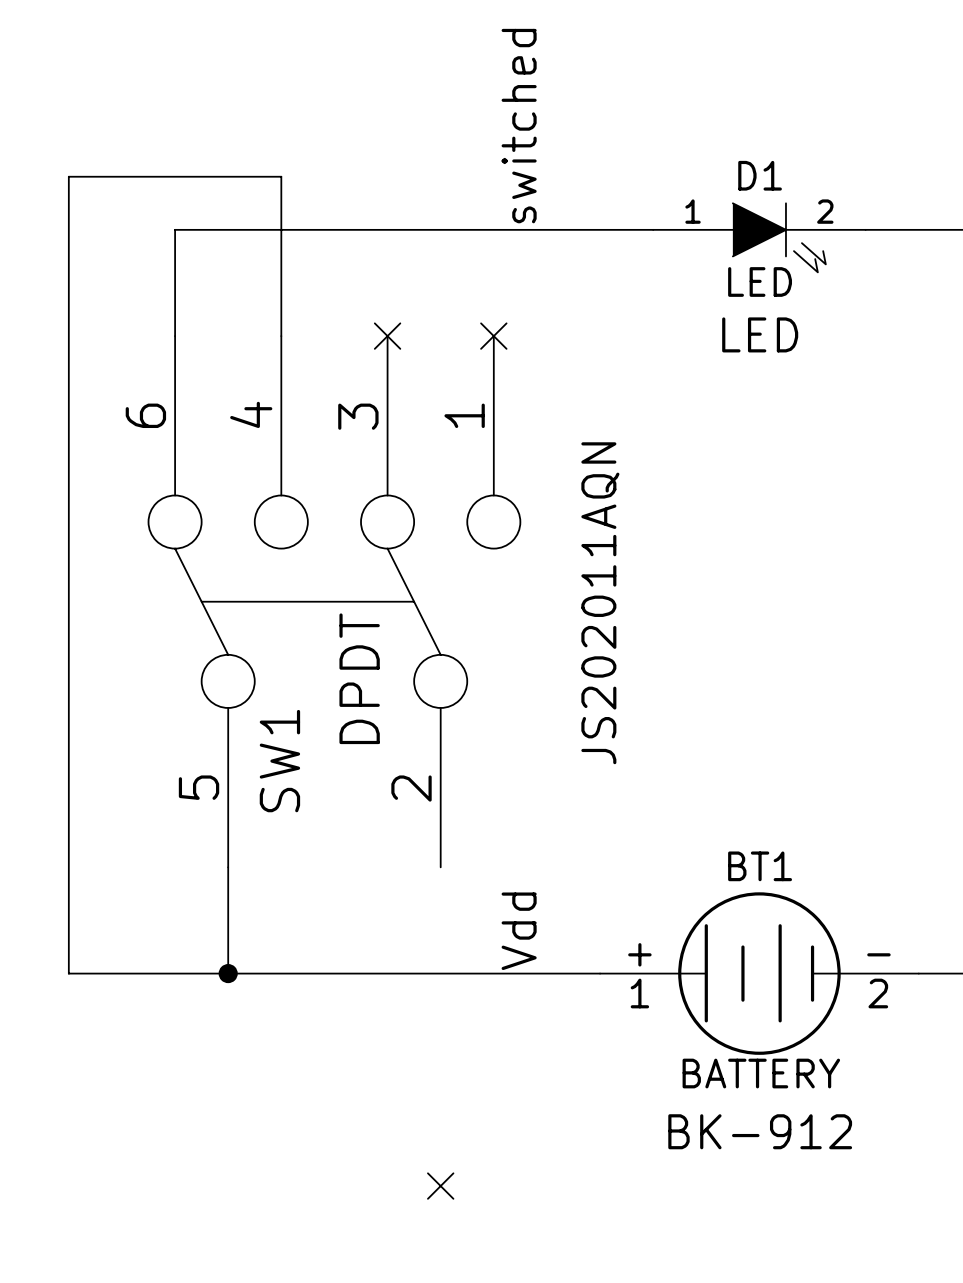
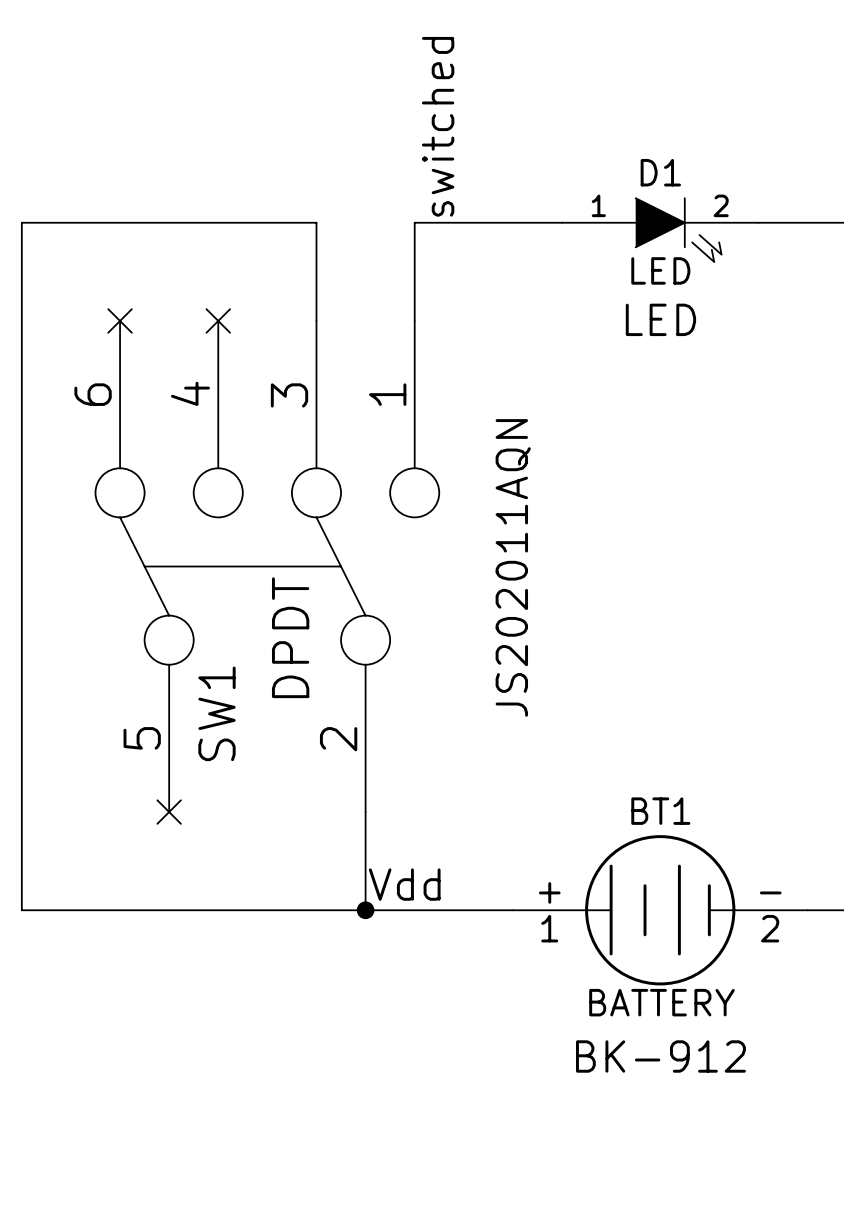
wire: (68, 229) (68, 176) (281, 176) (281, 336) -> (21, 222) (120, 222)
wire: (175, 229) (175, 336) -> (414, 222) (414, 320)
wire: (387, 229) (493, 229) -> (316, 222) (316, 320)
no-connect mark: none -> (120, 320)
no-connect mark: none -> (218, 320)
no-connect mark: (387, 336) -> none
no-connect mark: (493, 336) -> none
wire: (228, 867) (228, 973) -> (365, 812) (365, 910)
no-connect mark: none -> (169, 812)
label rotation: 0° (519, 931) -> 90° clockwise (404, 884)
junction: (228, 973) -> none
junction: none -> (365, 910)
no-connect mark: (440, 1186) -> none

